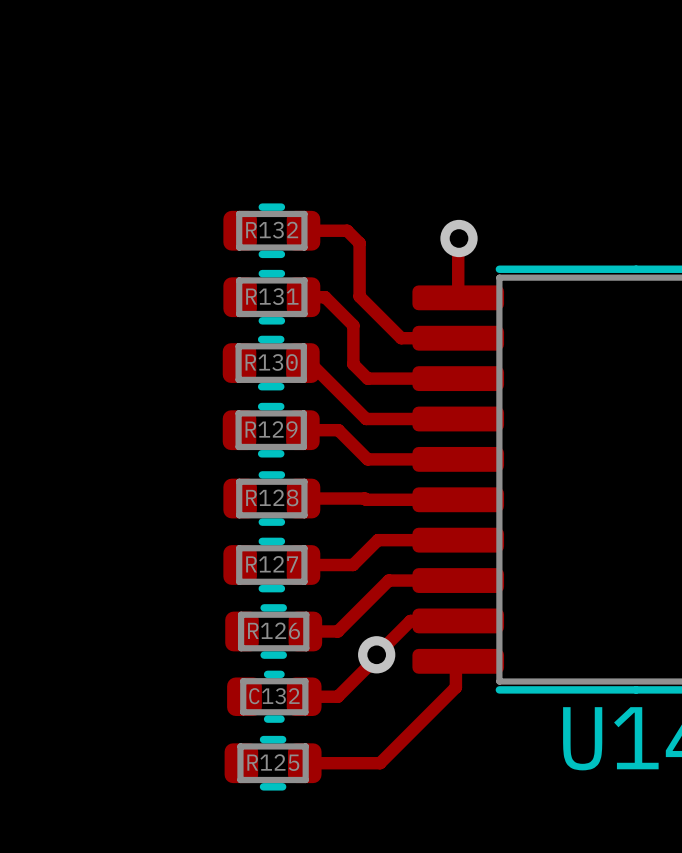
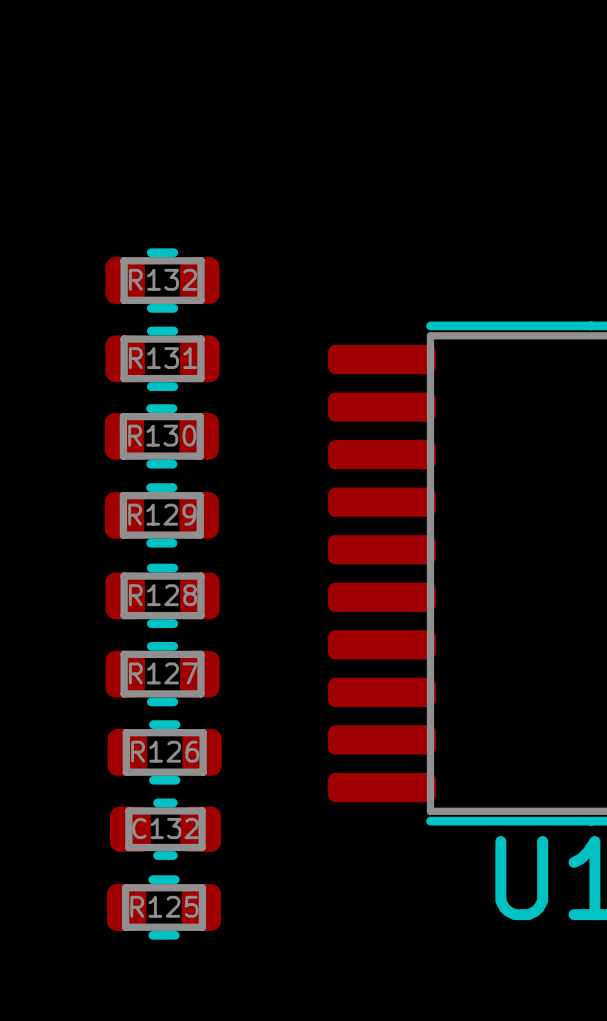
top track: (303, 230) (347, 230) (359, 243) (359, 296) (401, 338) (458, 338) -> none
via: (459, 238) -> none
top track: (458, 239) (458, 297) -> none
top track: (303, 297) (325, 297) (353, 325) (353, 364) (367, 378) (458, 378) -> none
top track: (302, 363) (310, 363) (366, 419) (458, 419) -> none
top track: (302, 430) (338, 430) (367, 459) (458, 459) -> none
top track: (303, 498) (458, 499) -> none
top track: (458, 540) (377, 540) (353, 565) (303, 565) -> none
top track: (458, 580) (388, 580) (337, 631) (305, 631) -> none
top track: (458, 620) (410, 620) (337, 696) (304, 696) -> none
via: (376, 654) -> none
top track: (458, 661) (455, 663) (455, 687) (380, 763) (304, 763) -> none

